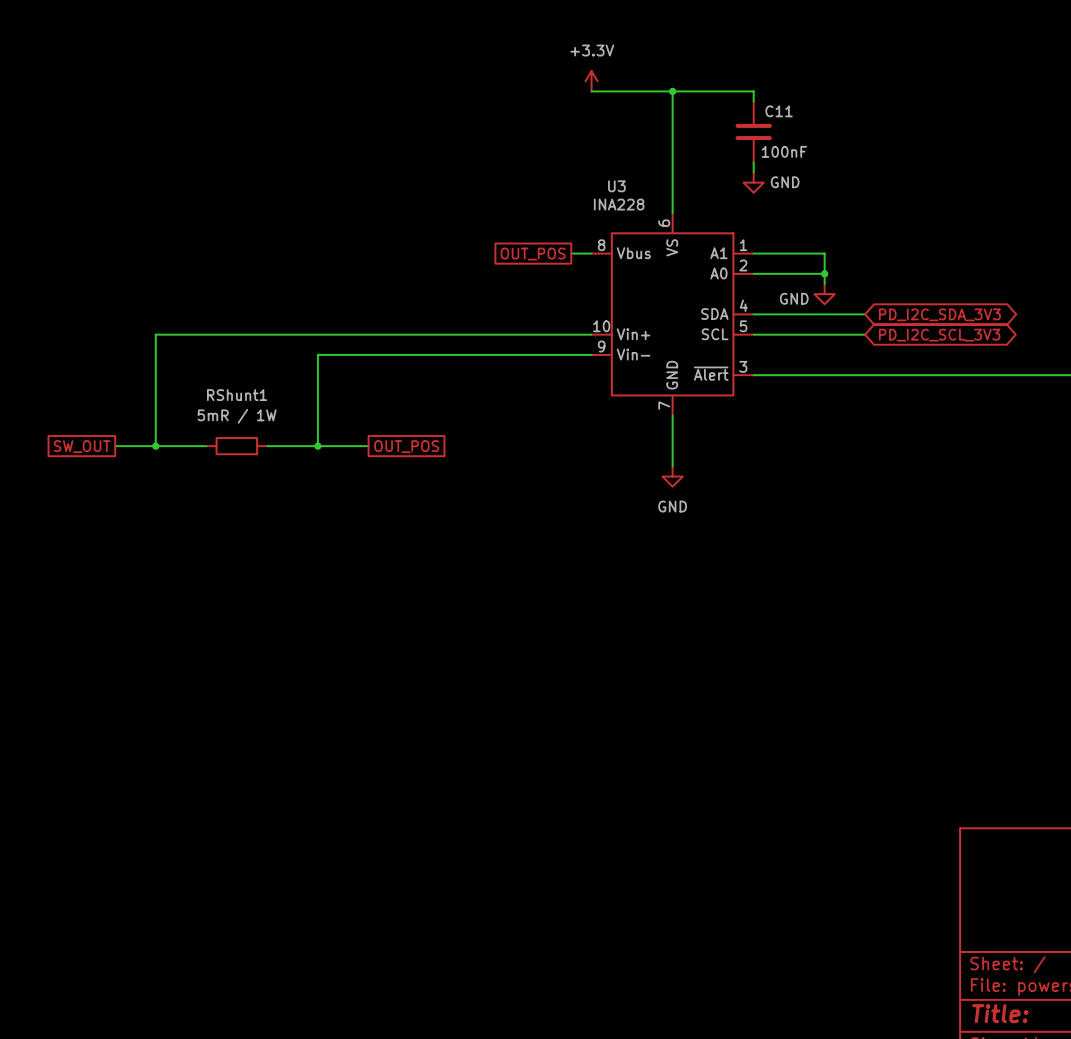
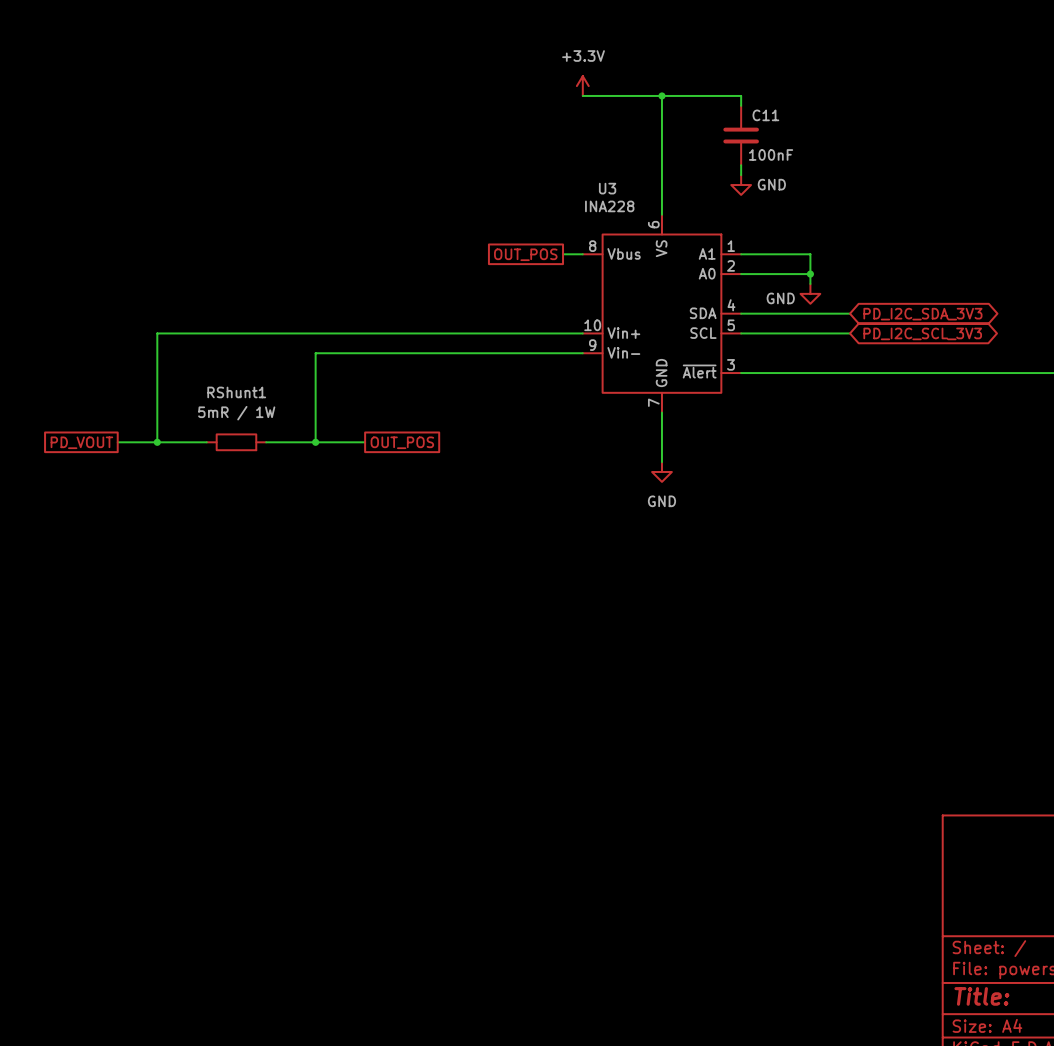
global label: SW_OUT (82, 446) -> PD_VOUT (81, 442)

